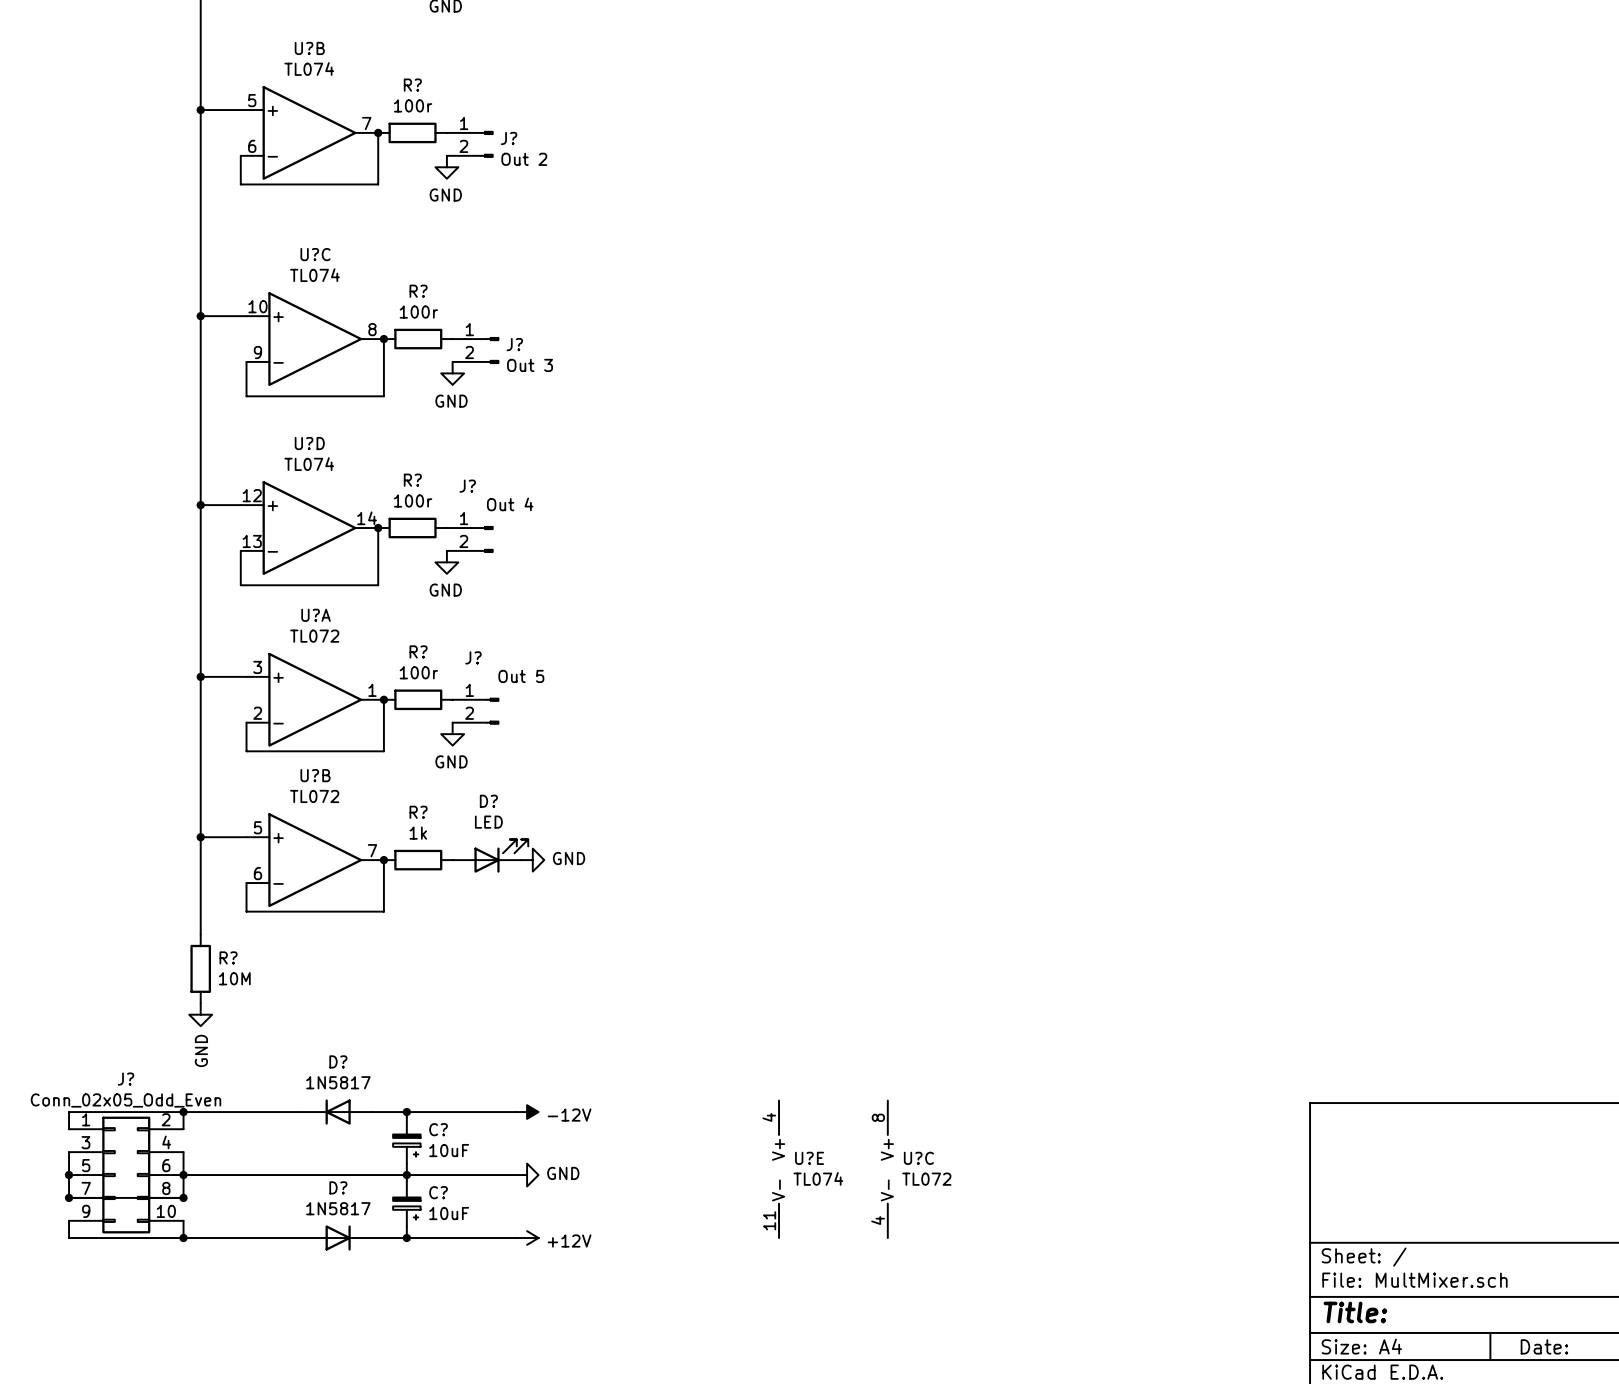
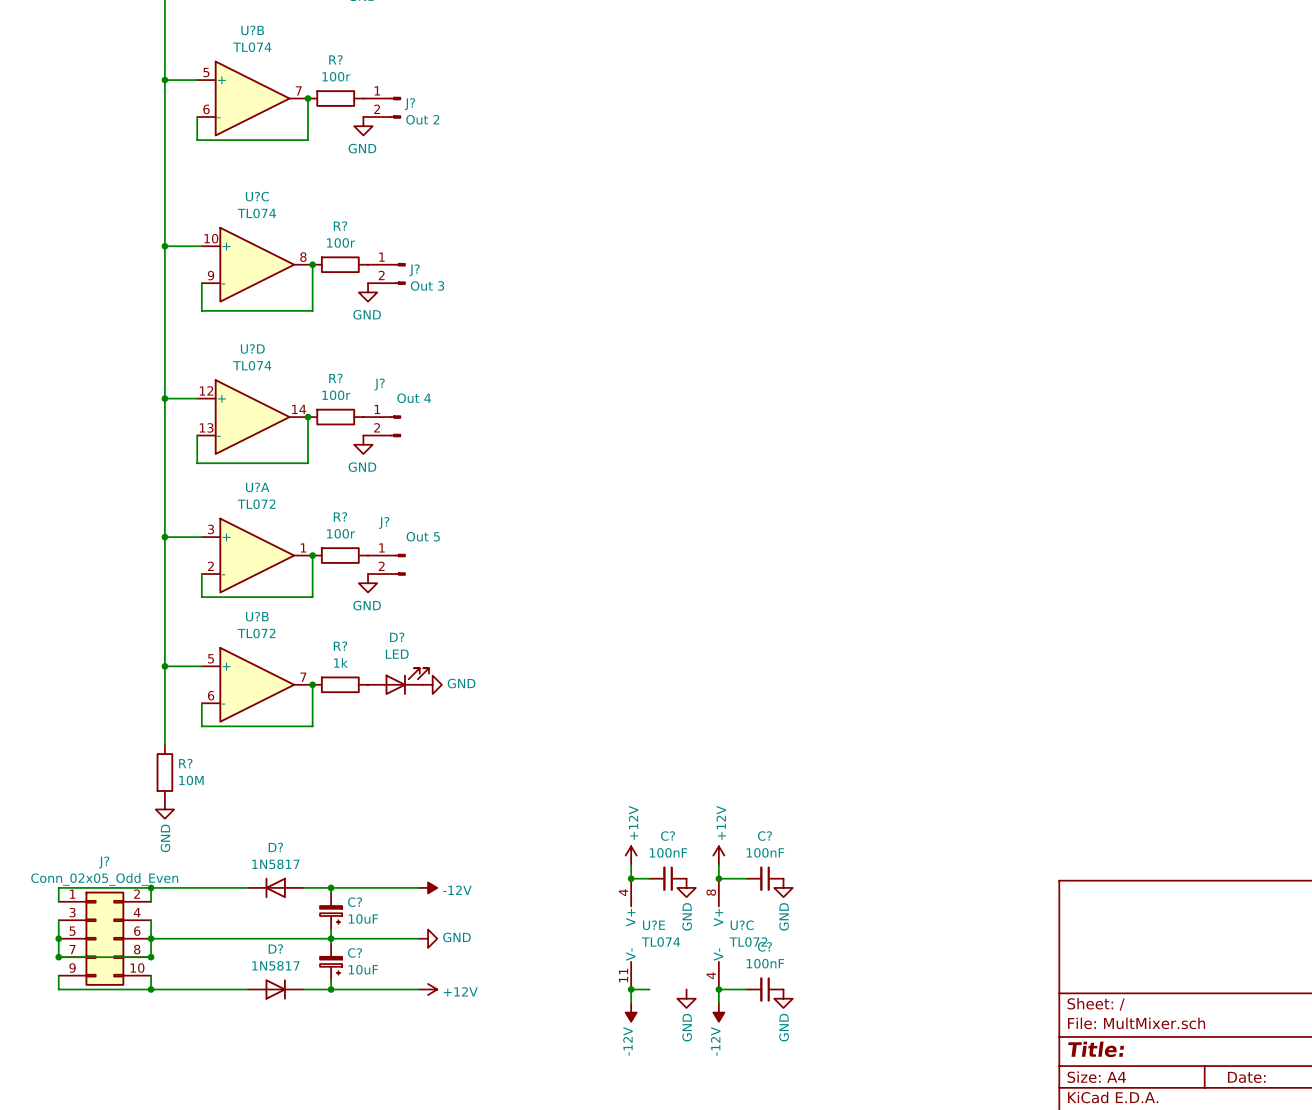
power symbol: none -> +12V (631, 855)
power symbol: none -> +12V (718, 855)
wire: none -> (631, 864) (631, 878) (649, 878)
wire: none -> (718, 864) (718, 878) (746, 878)
junction: none -> (631, 878)
C?: none -> 100nF (668, 878)
junction: none -> (718, 878)
C?: none -> 100nF (765, 878)
power symbol: none -> GND (686, 887)
power symbol: none -> GND (783, 887)
junction: none -> (631, 989)
wire: none -> (649, 989) (631, 989) (631, 1003)
junction: none -> (718, 989)
wire: none -> (746, 989) (718, 989) (718, 1003)
C?: none -> 100nF (765, 989)
power symbol: none -> GND (686, 998)
power symbol: none -> GND (783, 998)
power symbol: none -> -12V (631, 1012)
power symbol: none -> -12V (718, 1012)

